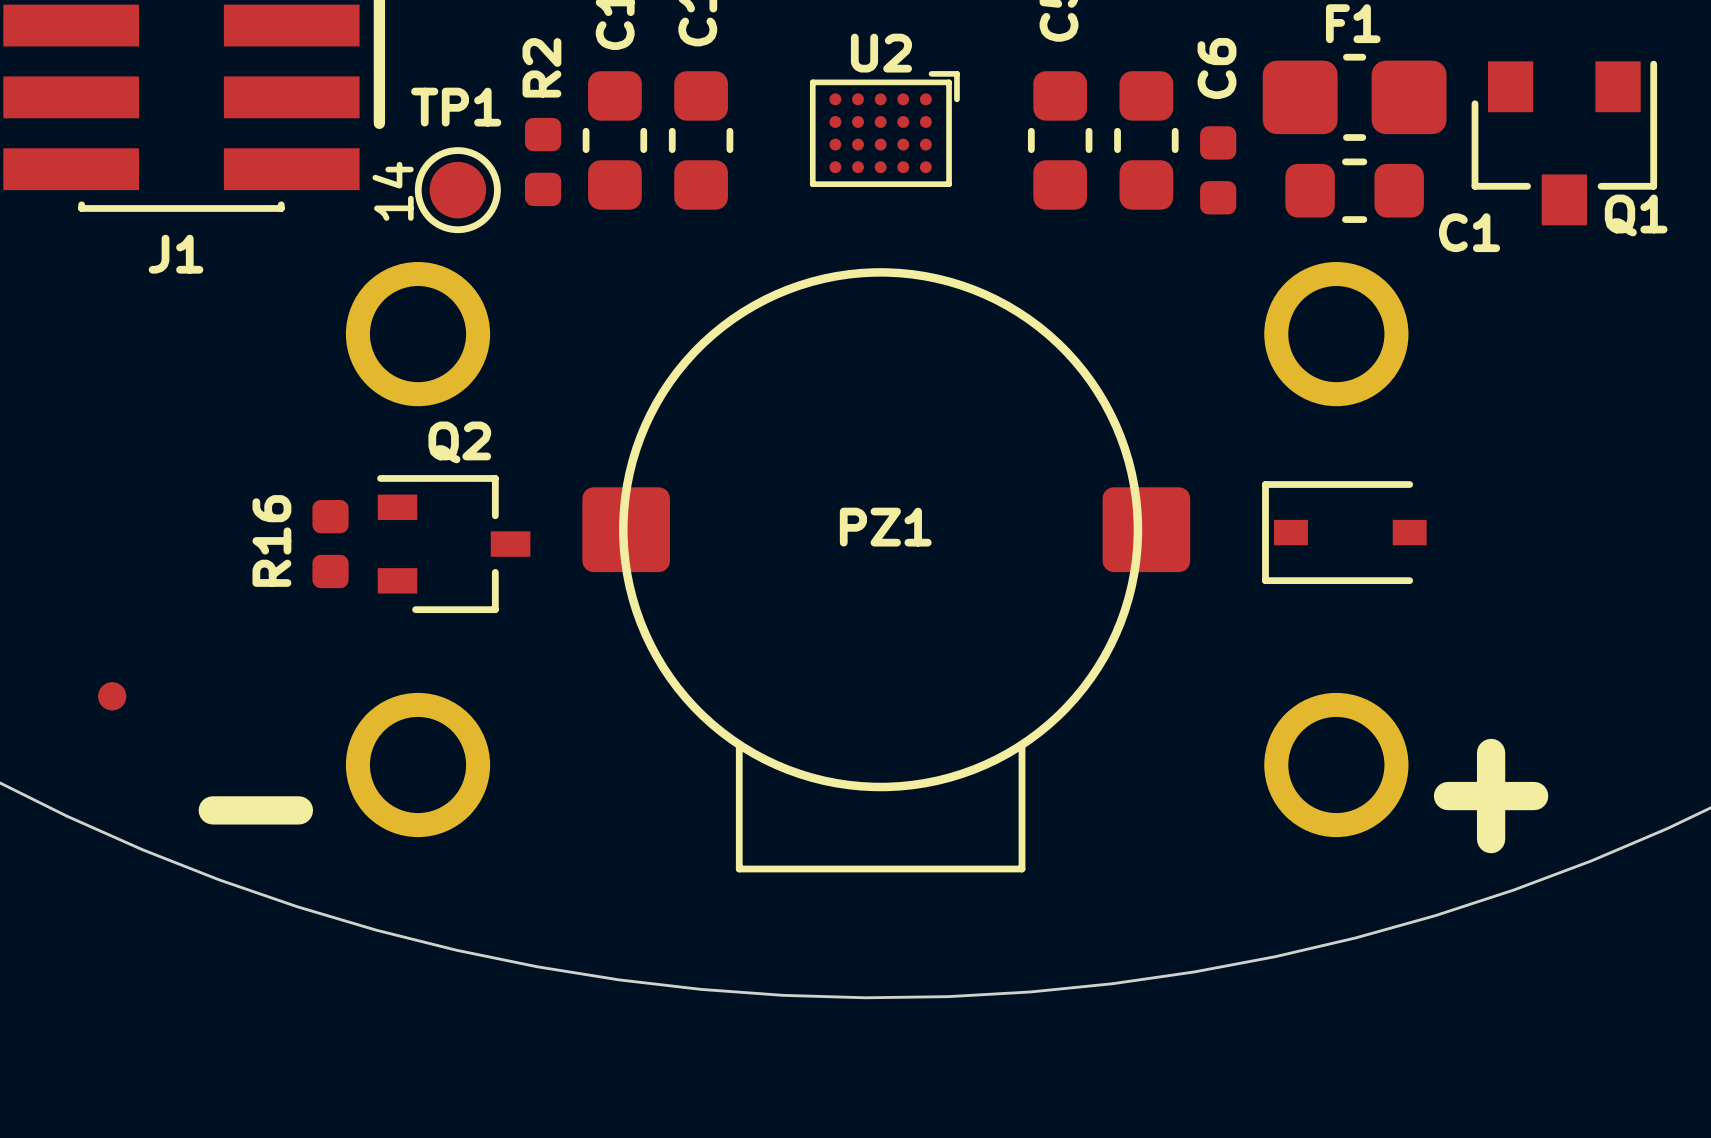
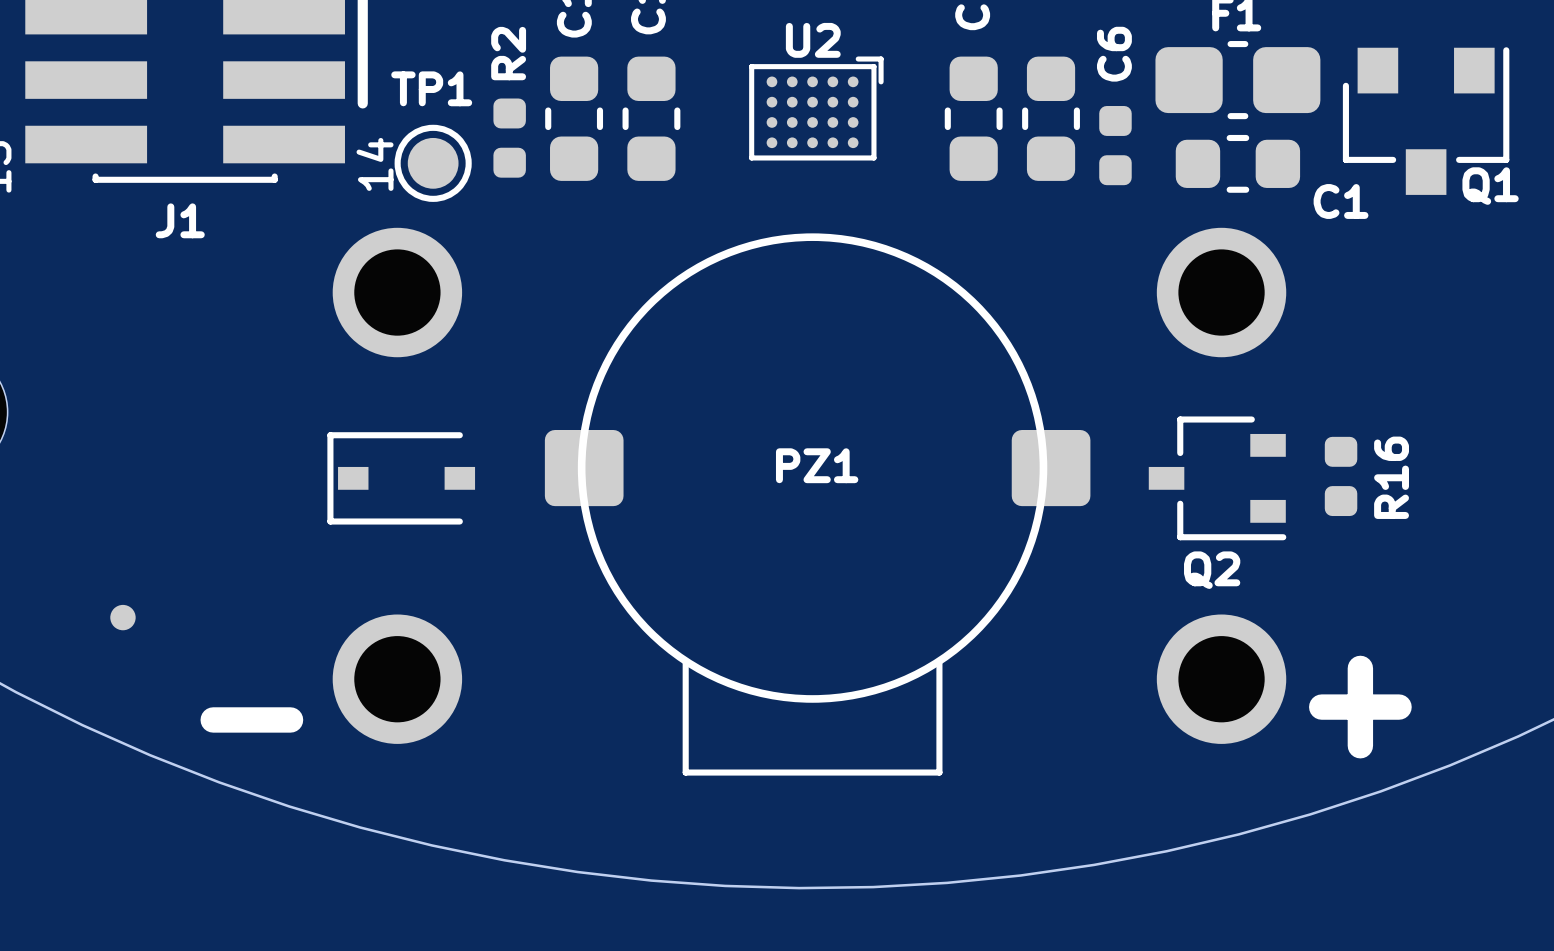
part position: (1344, 532) -> (401, 478)
R16 name position: R16 (271, 540) -> R16 (1391, 477)
R16 position: (330, 544) -> (1341, 476)
Q2 rotation: 0° (453, 544) -> 180° (1217, 478)
Q2 position: (453, 544) -> (1217, 478)

